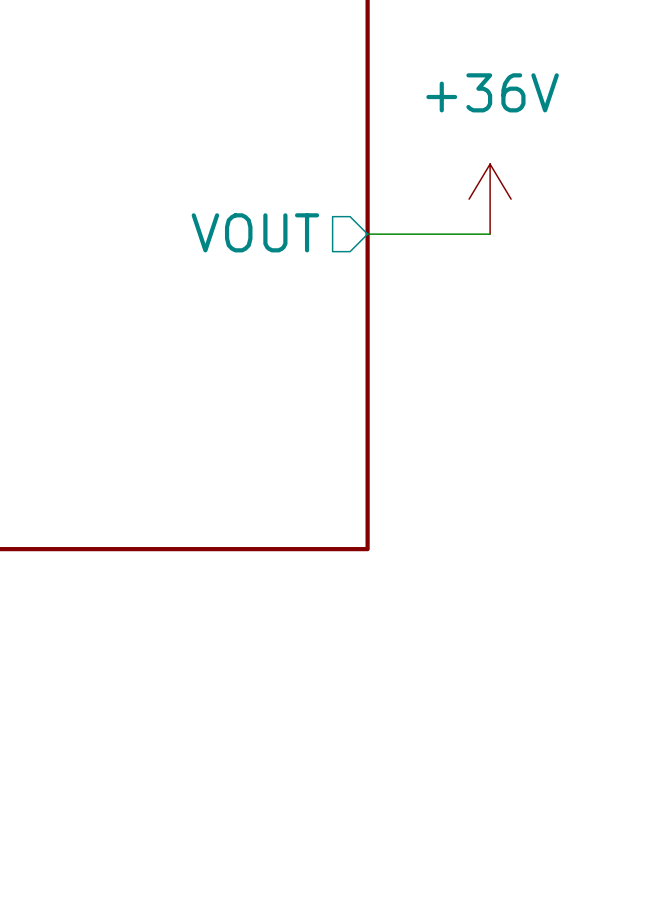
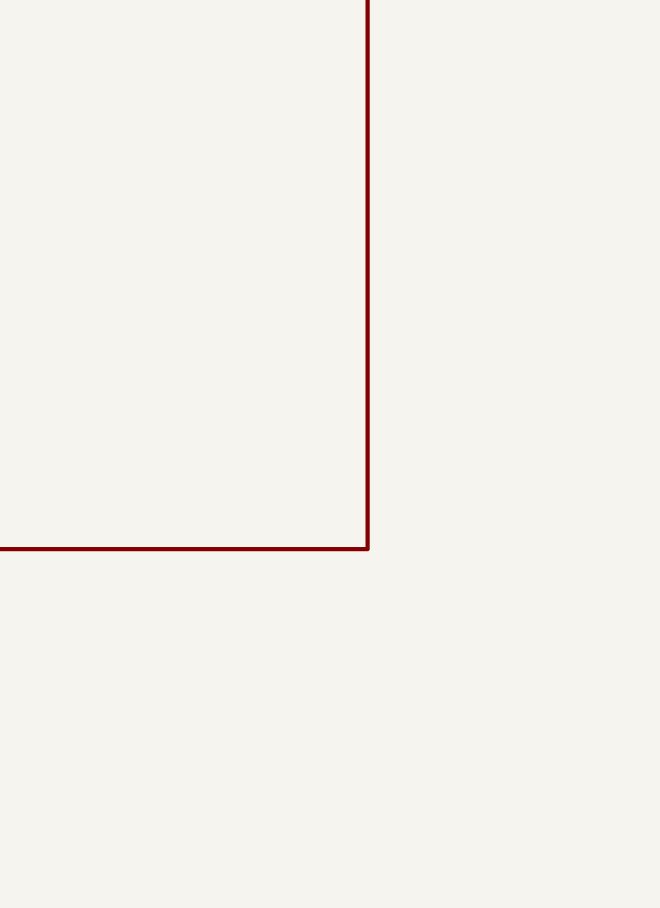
power symbol: +36V (490, 199) -> none
sheet pin: VOUT (255, 232) -> none
wire: (367, 234) (490, 234) -> none

